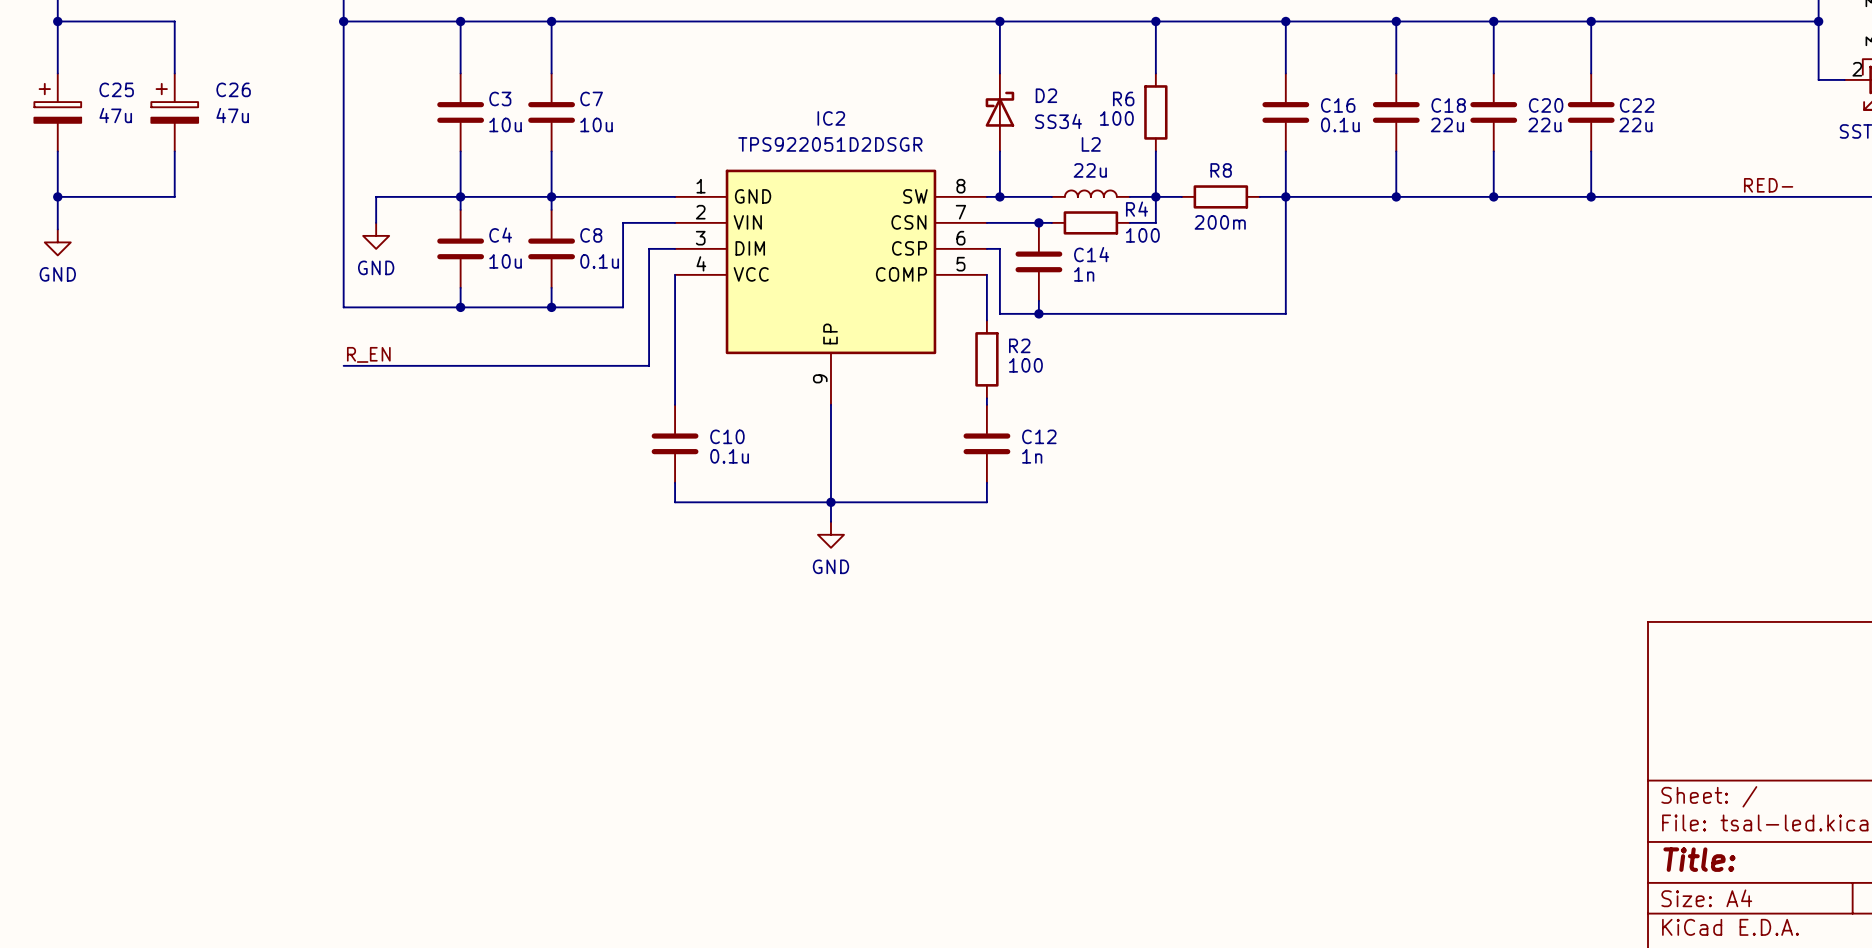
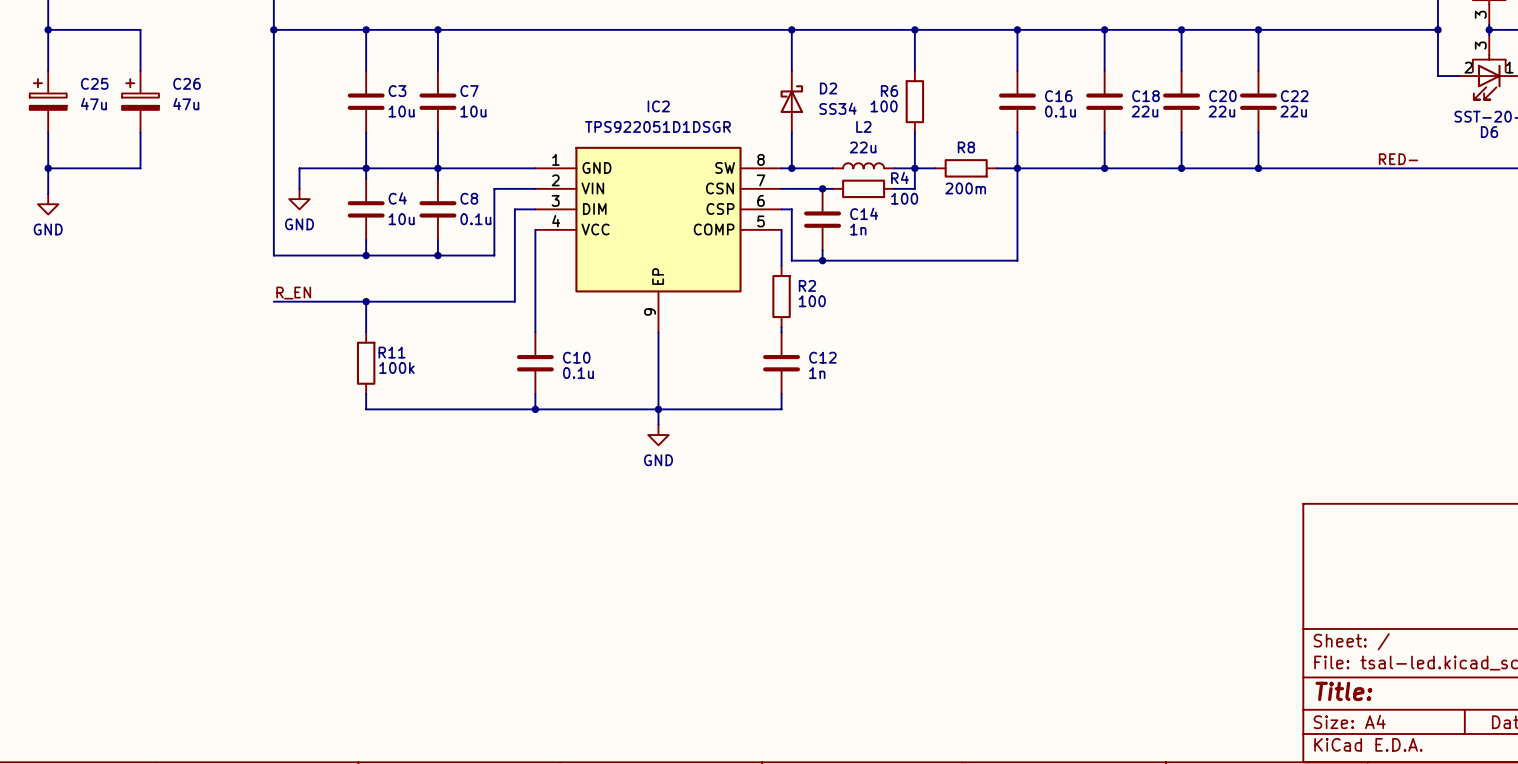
IC2 value: TPS922051D2DSGR (830, 144) -> TPS922051D1DSGR (657, 126)
wire: none -> (366, 301) (366, 332)
junction: none -> (366, 301)
R11: none -> 100k (366, 363)
wire: none -> (366, 393) (366, 409) (535, 409)
junction: none -> (535, 409)

